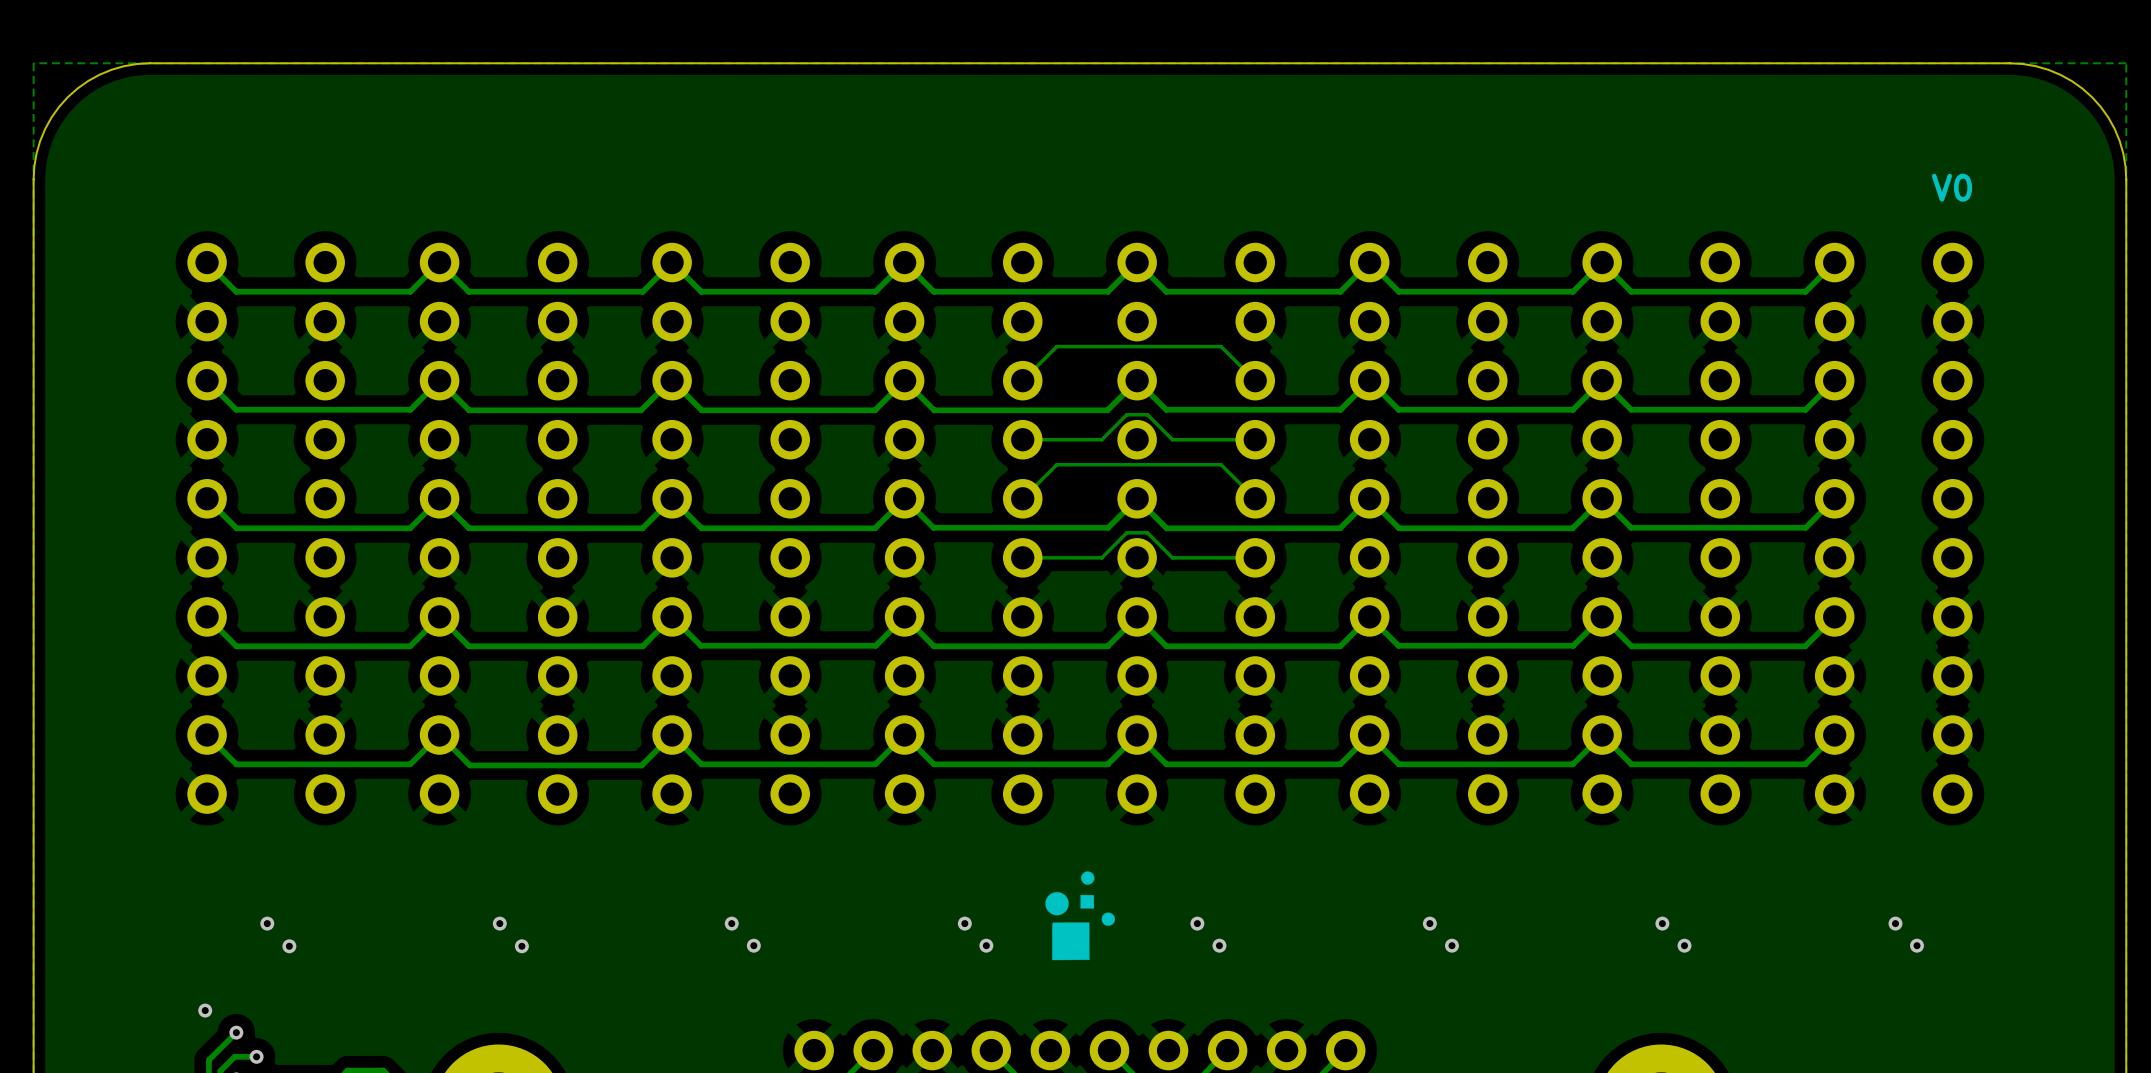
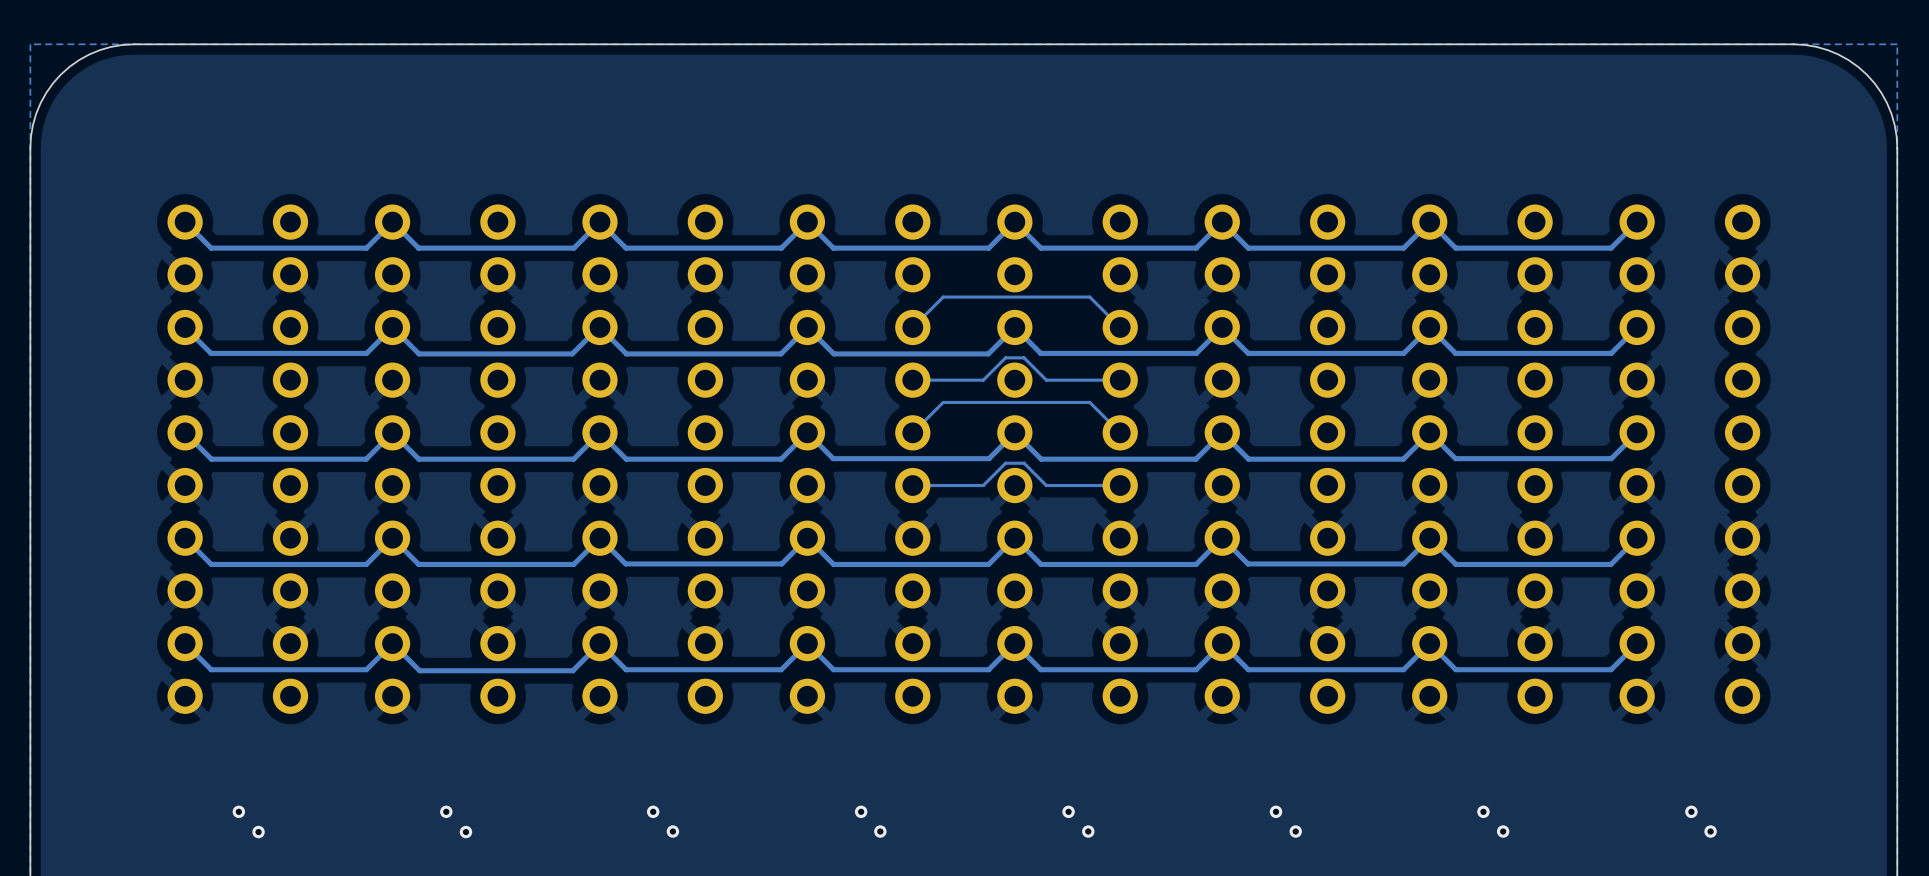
text: V0 (1951, 187) -> none
drawing: [1045, 871, 1116, 961] -> none

